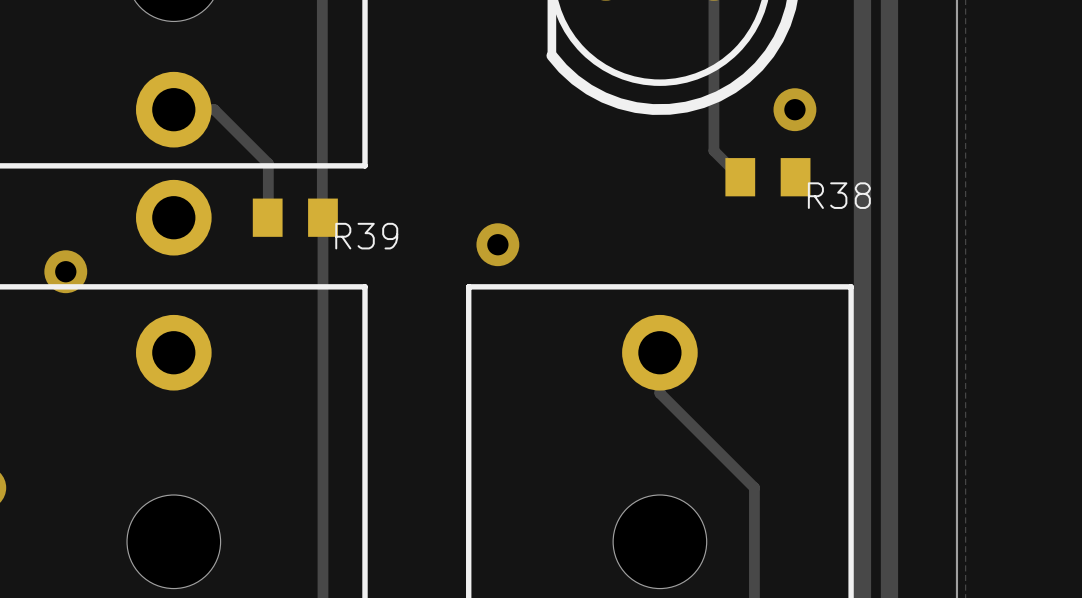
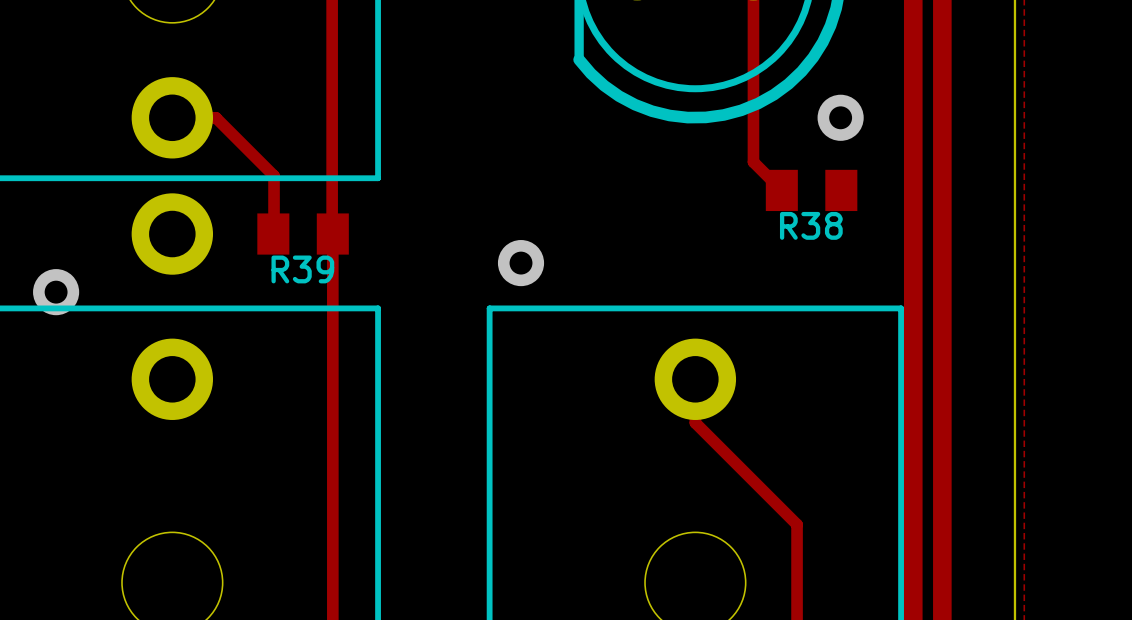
R38 name position: R38 (839, 195) -> R38 (811, 225)
R39 name position: R39 (366, 236) -> R39 (302, 269)

